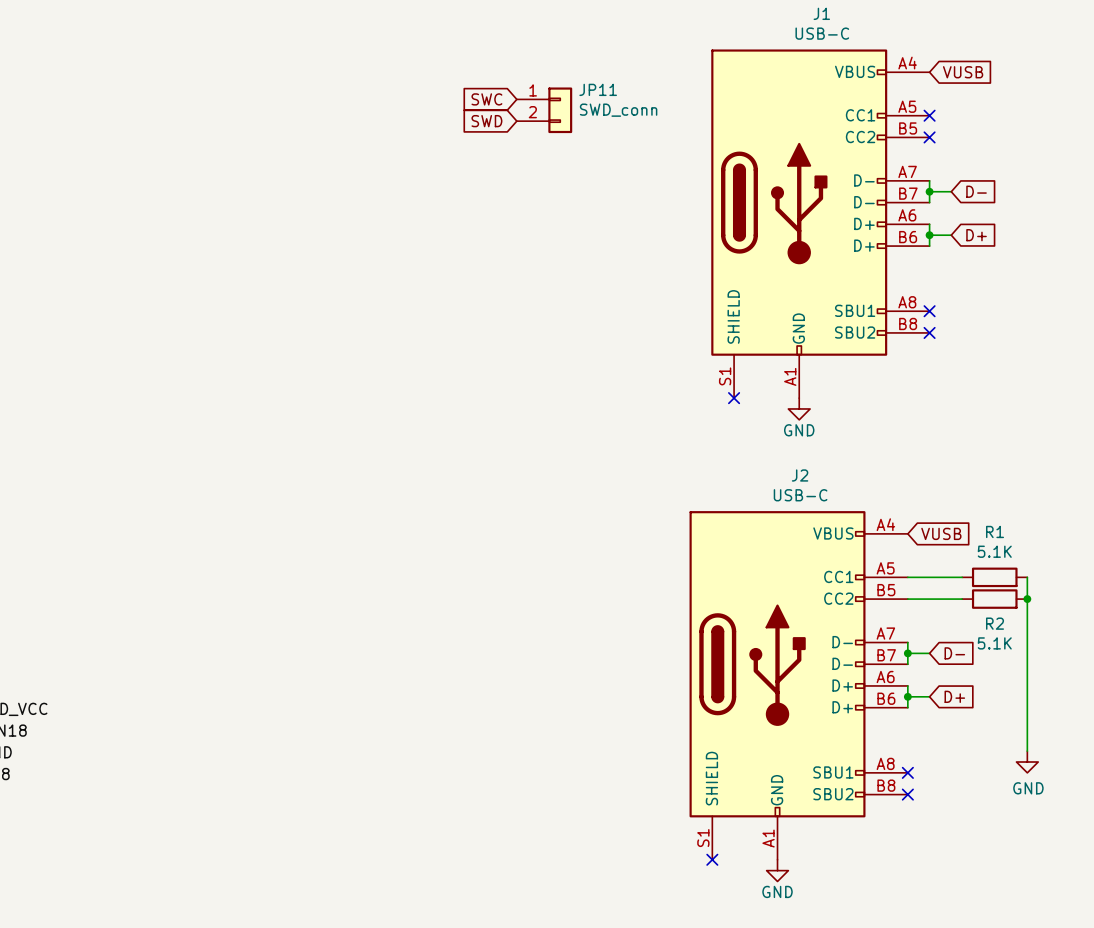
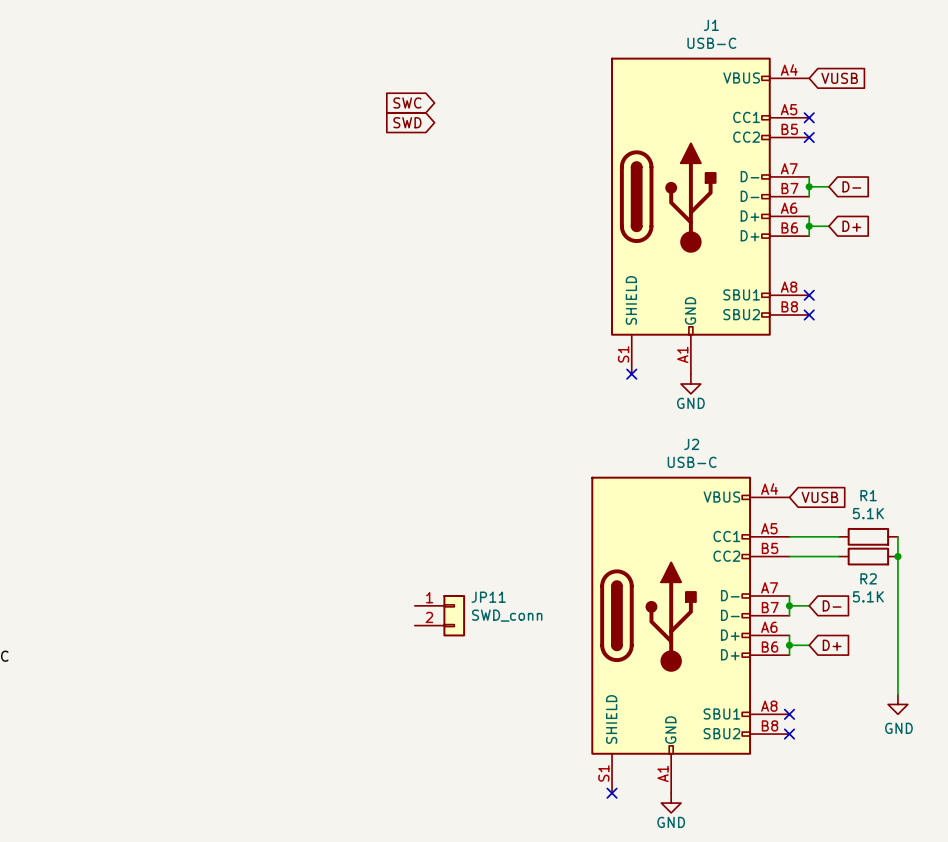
JP11 position: (544, 110) -> (439, 615)

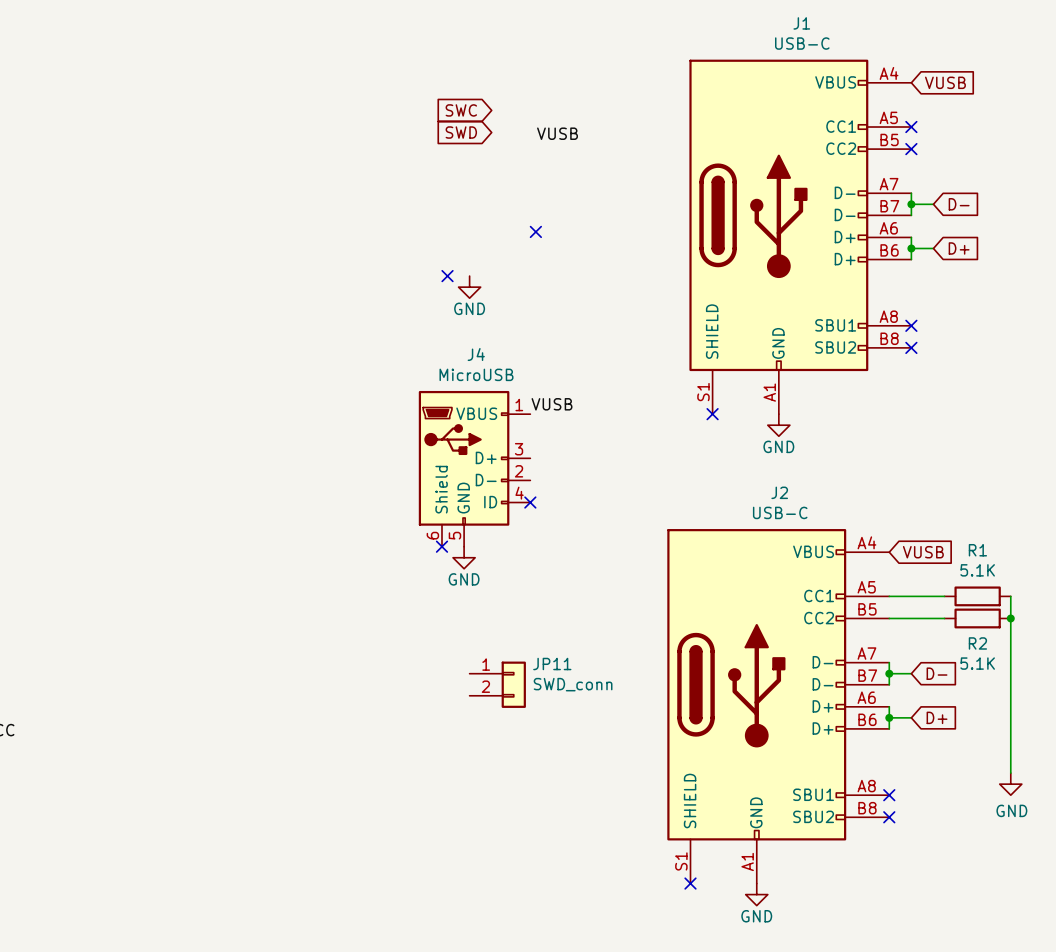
label: none -> VUSB (557, 133)
no-connect mark: none -> (535, 231)
no-connect mark: none -> (447, 276)
power symbol: none -> GND (469, 287)
label: none -> VUSB (551, 404)
J4: none -> MicroUSB (474, 468)
no-connect mark: none -> (530, 502)
no-connect mark: none -> (441, 546)
power symbol: none -> GND (464, 557)

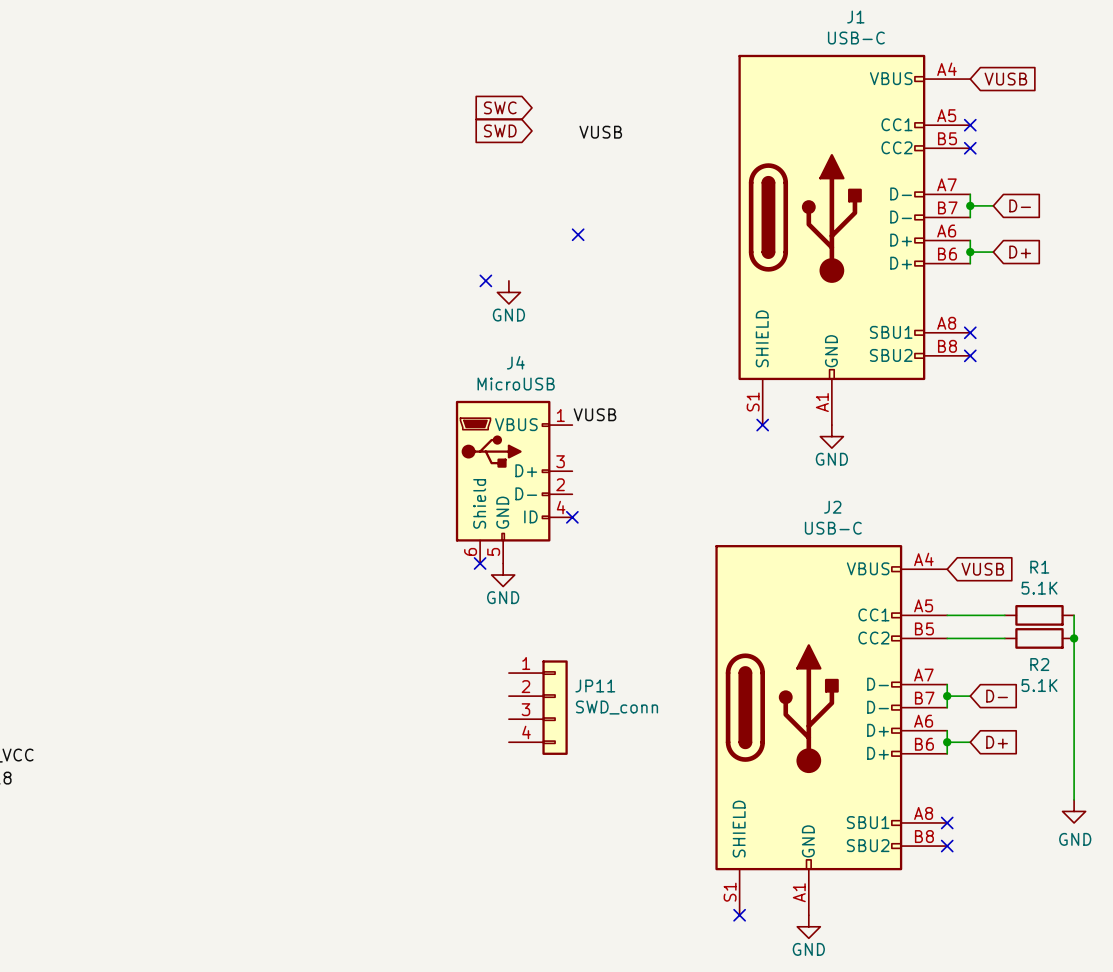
JP11 symbol: [469, 661, 526, 708] -> [508, 660, 568, 755]

